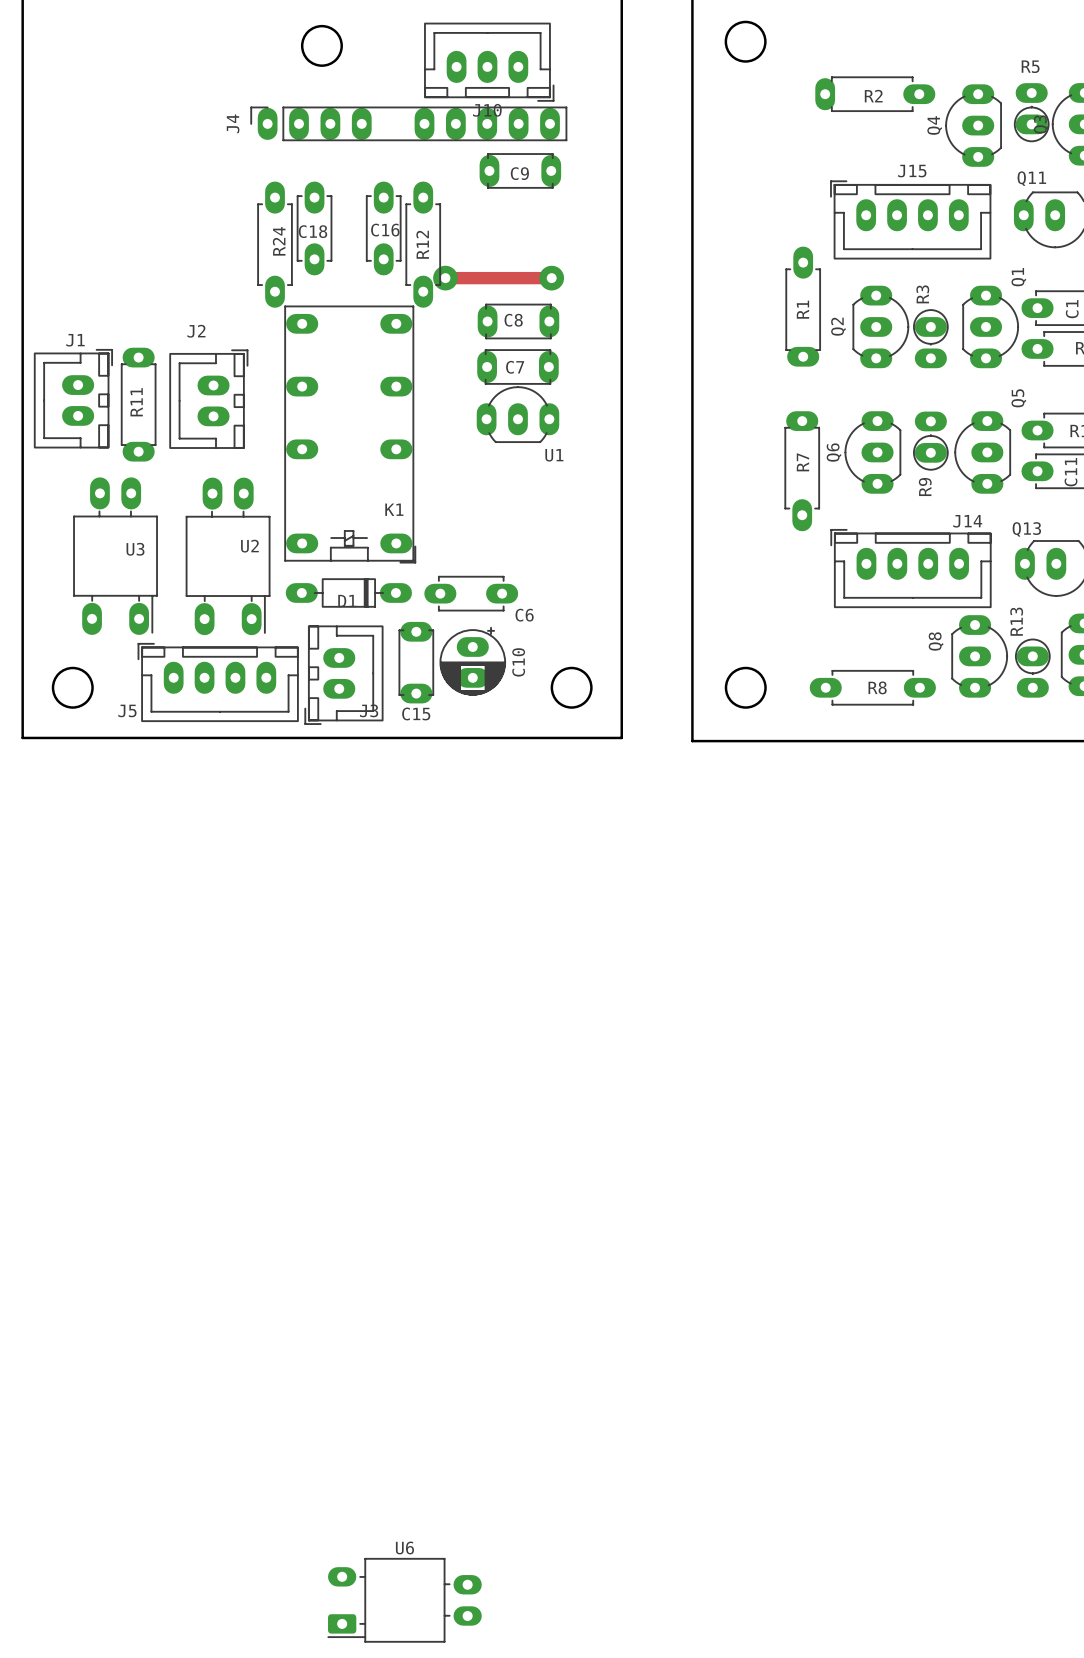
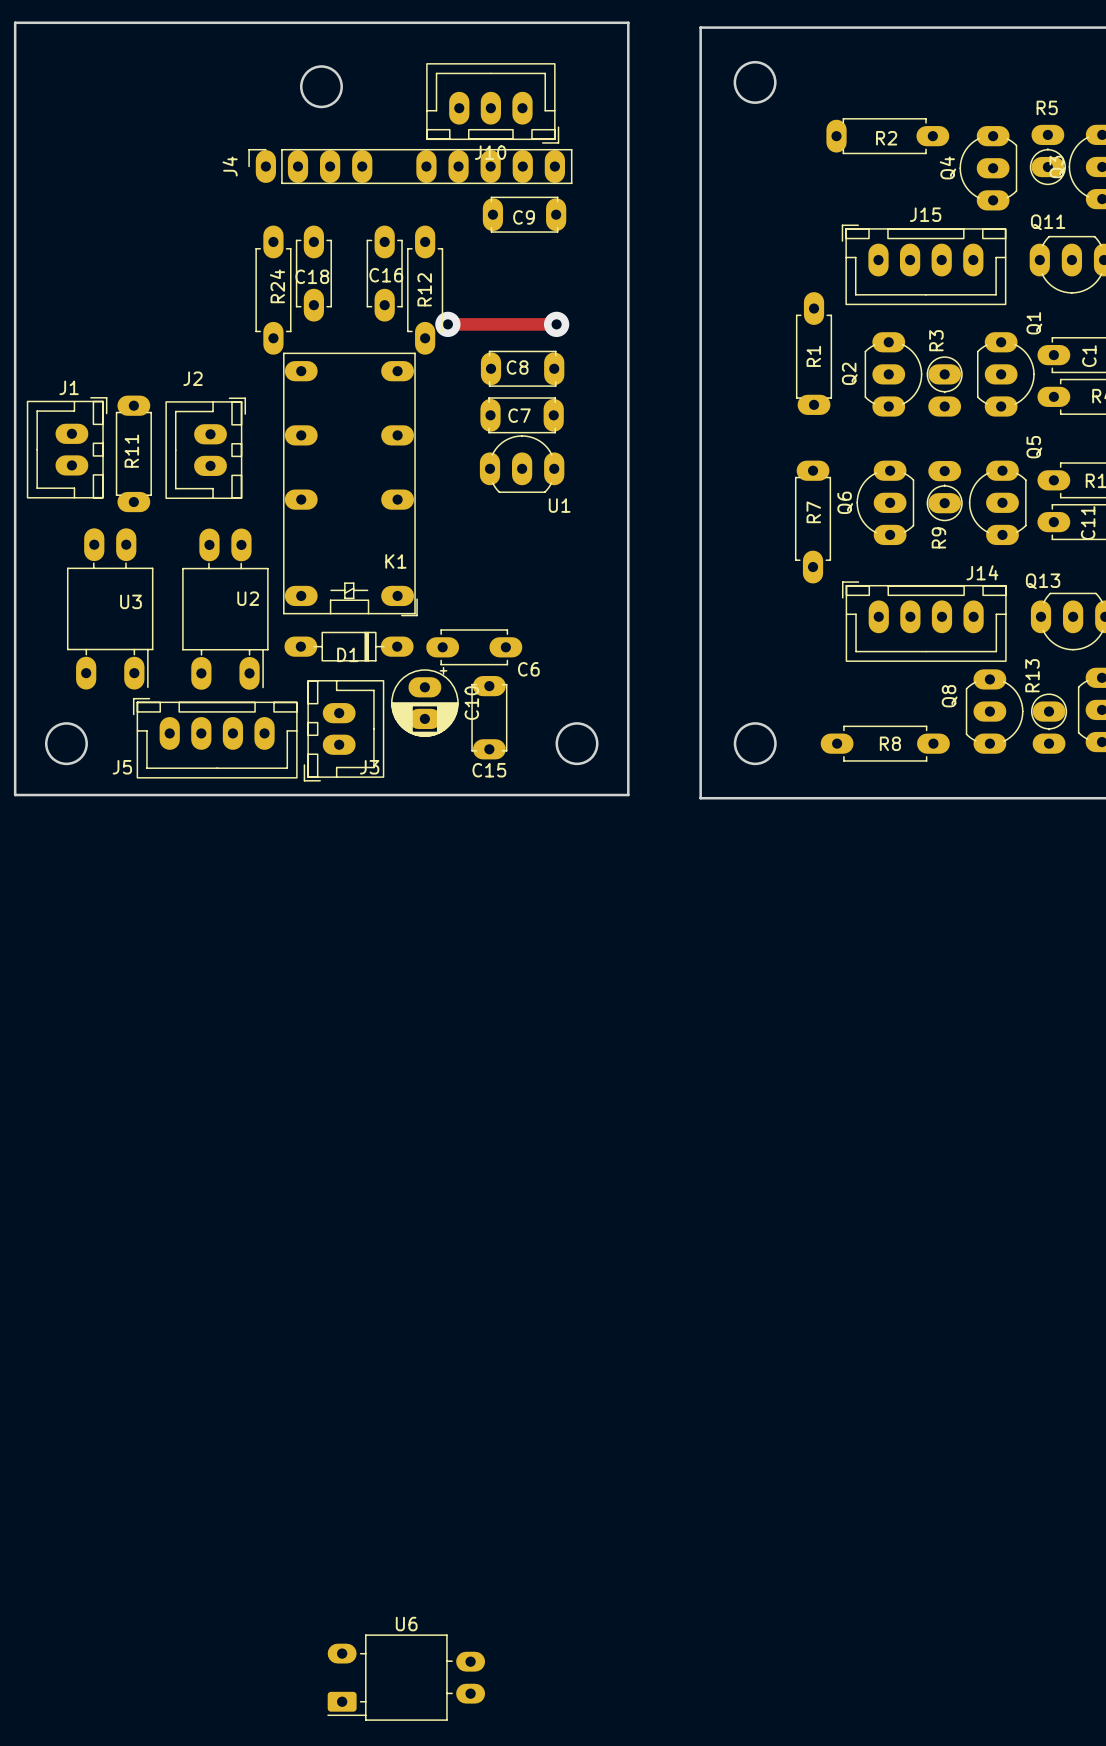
C10 position: (472, 661) -> (424, 701)
C15 position: (416, 662) -> (489, 717)

